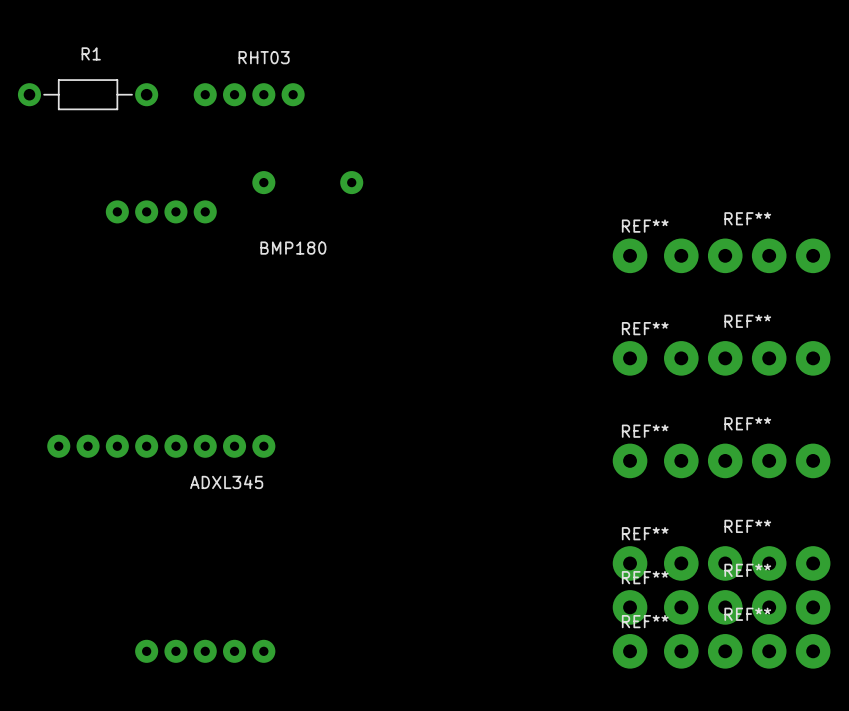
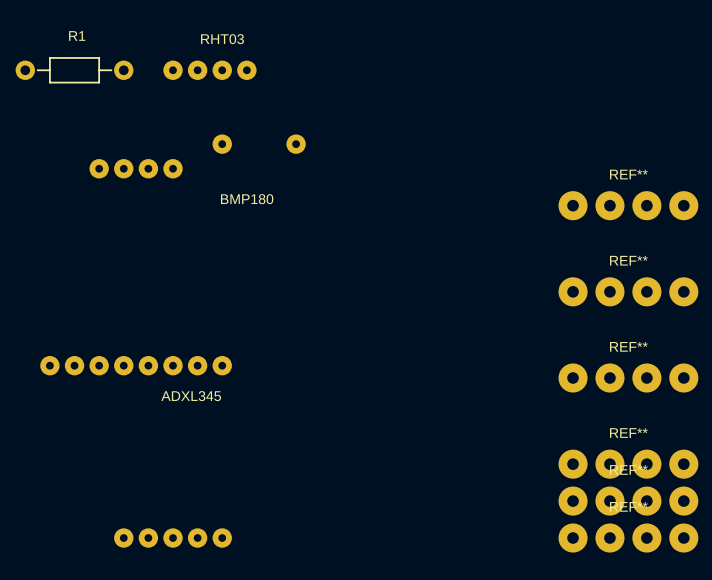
REF**: (630, 255) -> none
REF**: (630, 358) -> none
REF**: (630, 460) -> none
REF**: (630, 563) -> none
REF**: (630, 607) -> none
REF**: (630, 651) -> none

